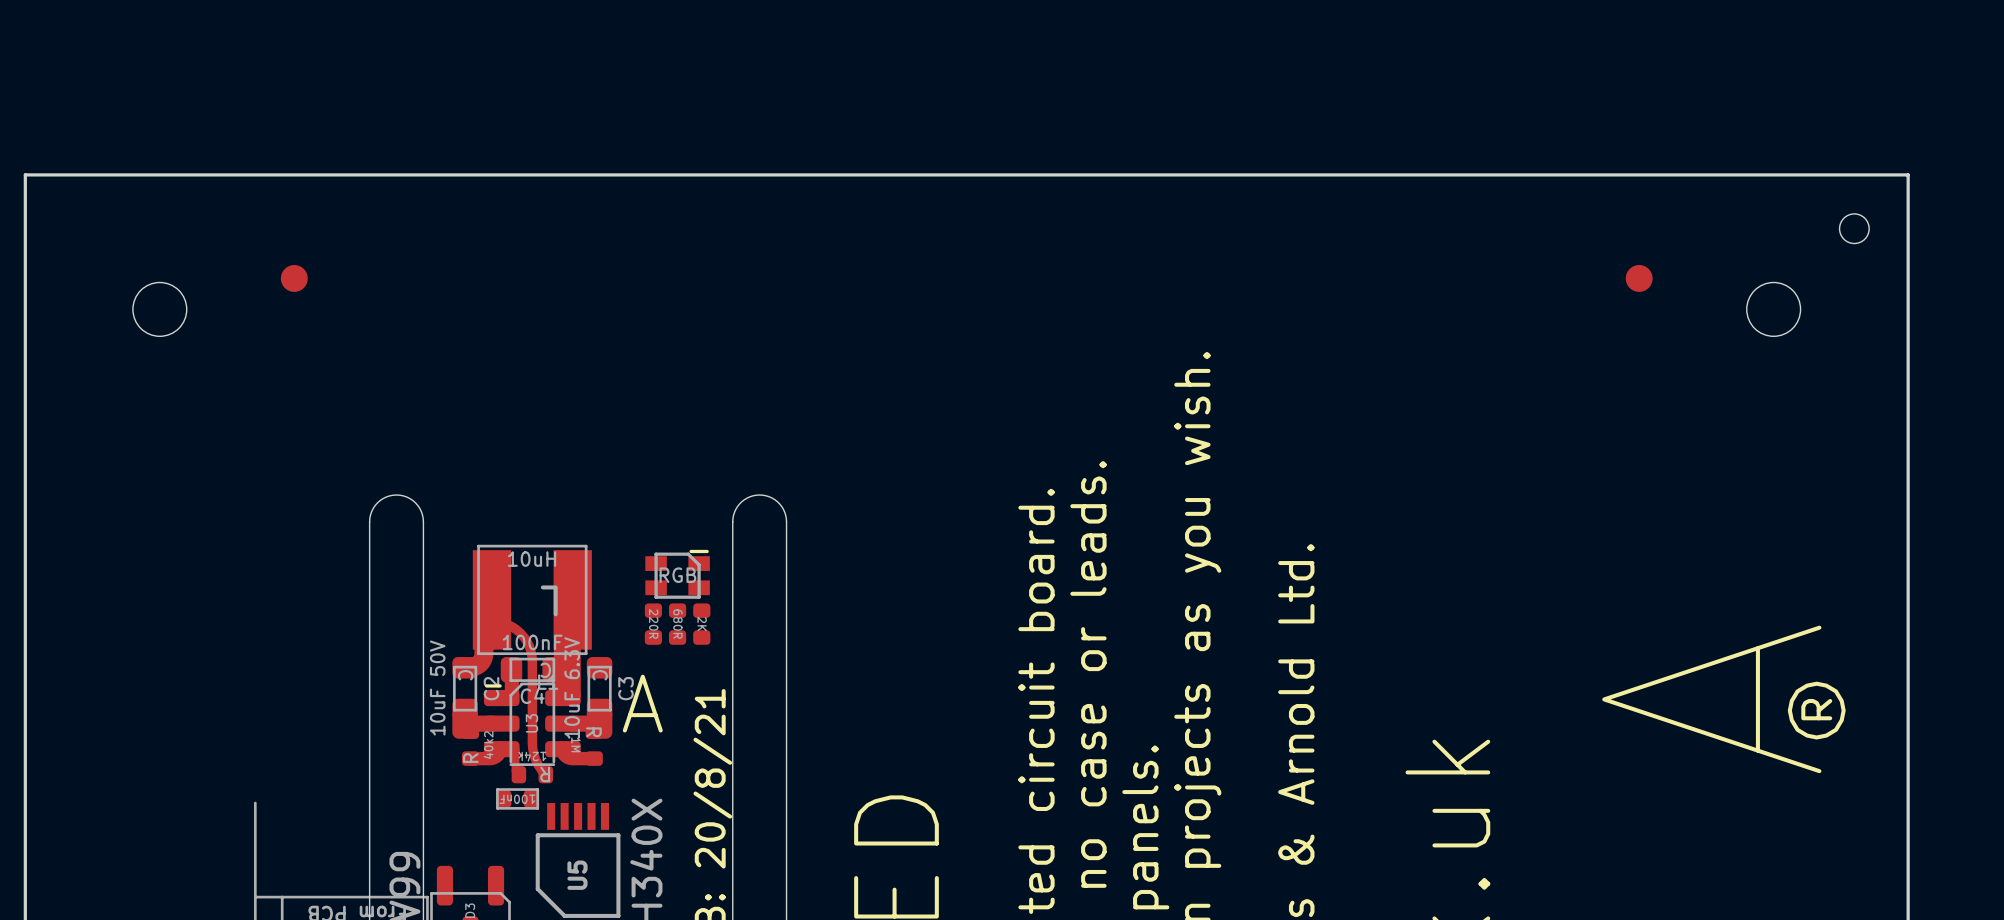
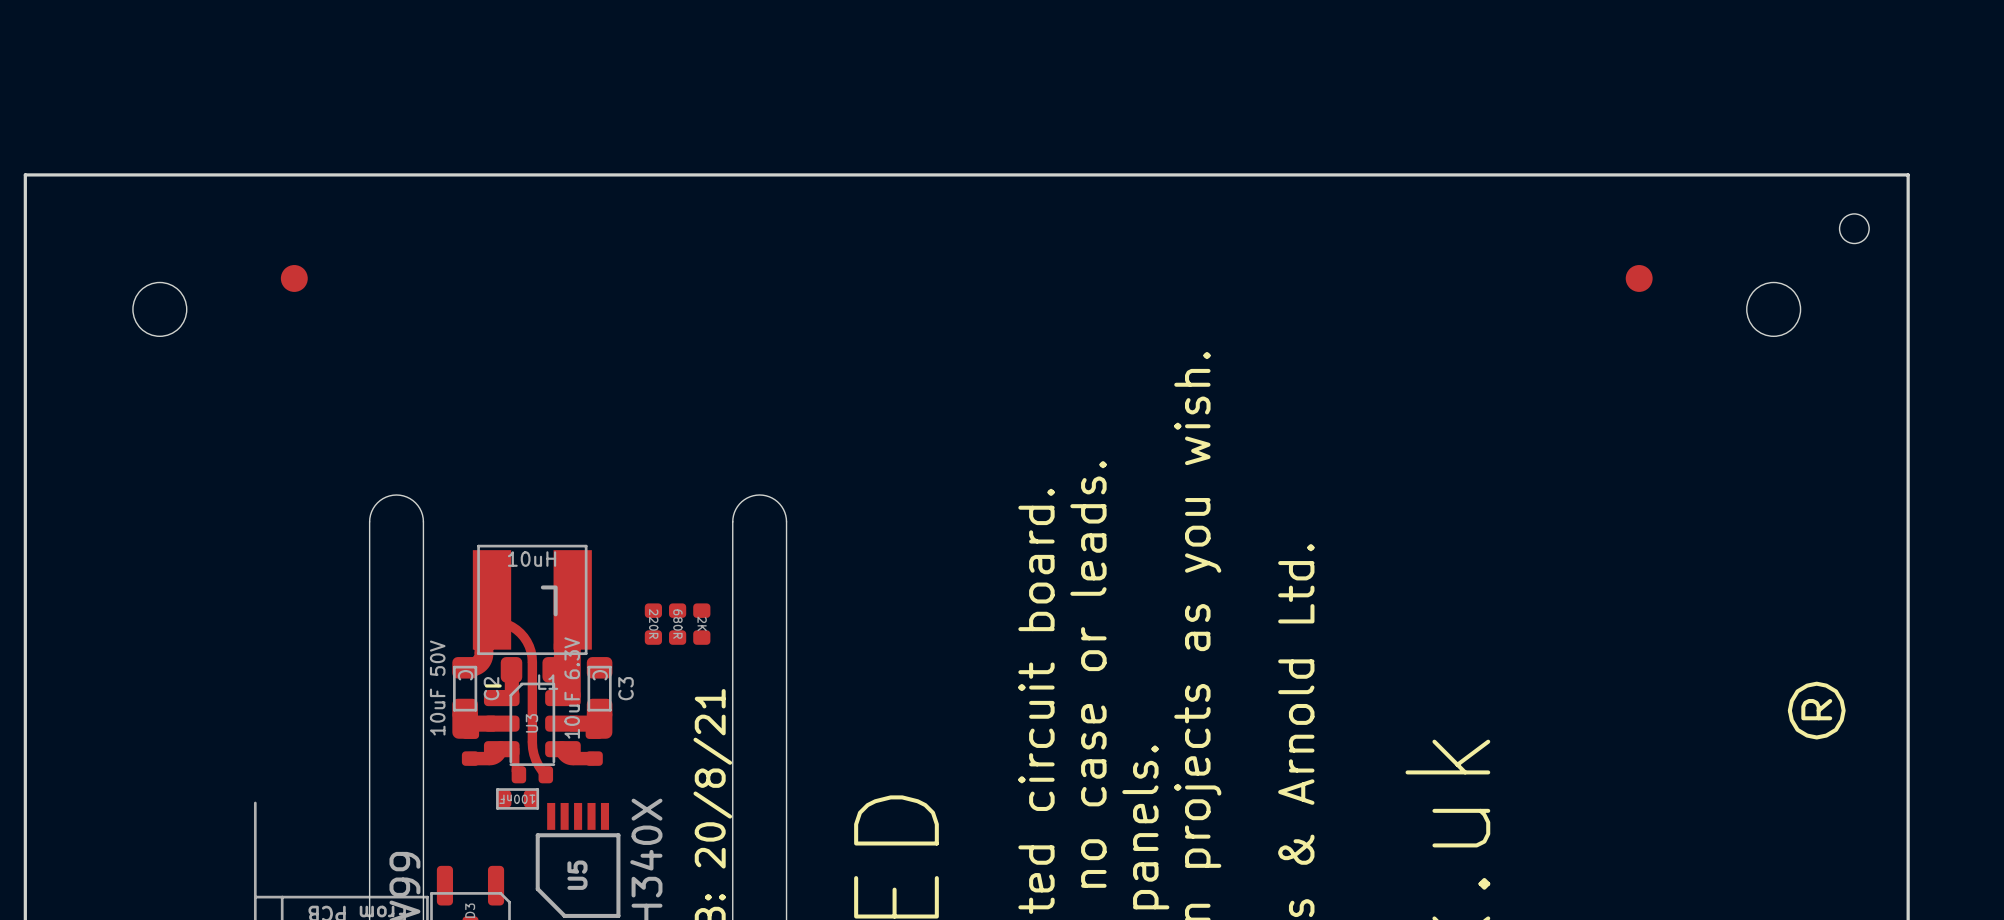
part: RGB (677, 574) -> none
C4: 100nF (532, 669) -> none
text: A (1711, 699) -> none
text: A (642, 703) -> none
drawing: [462, 727, 602, 783] -> none

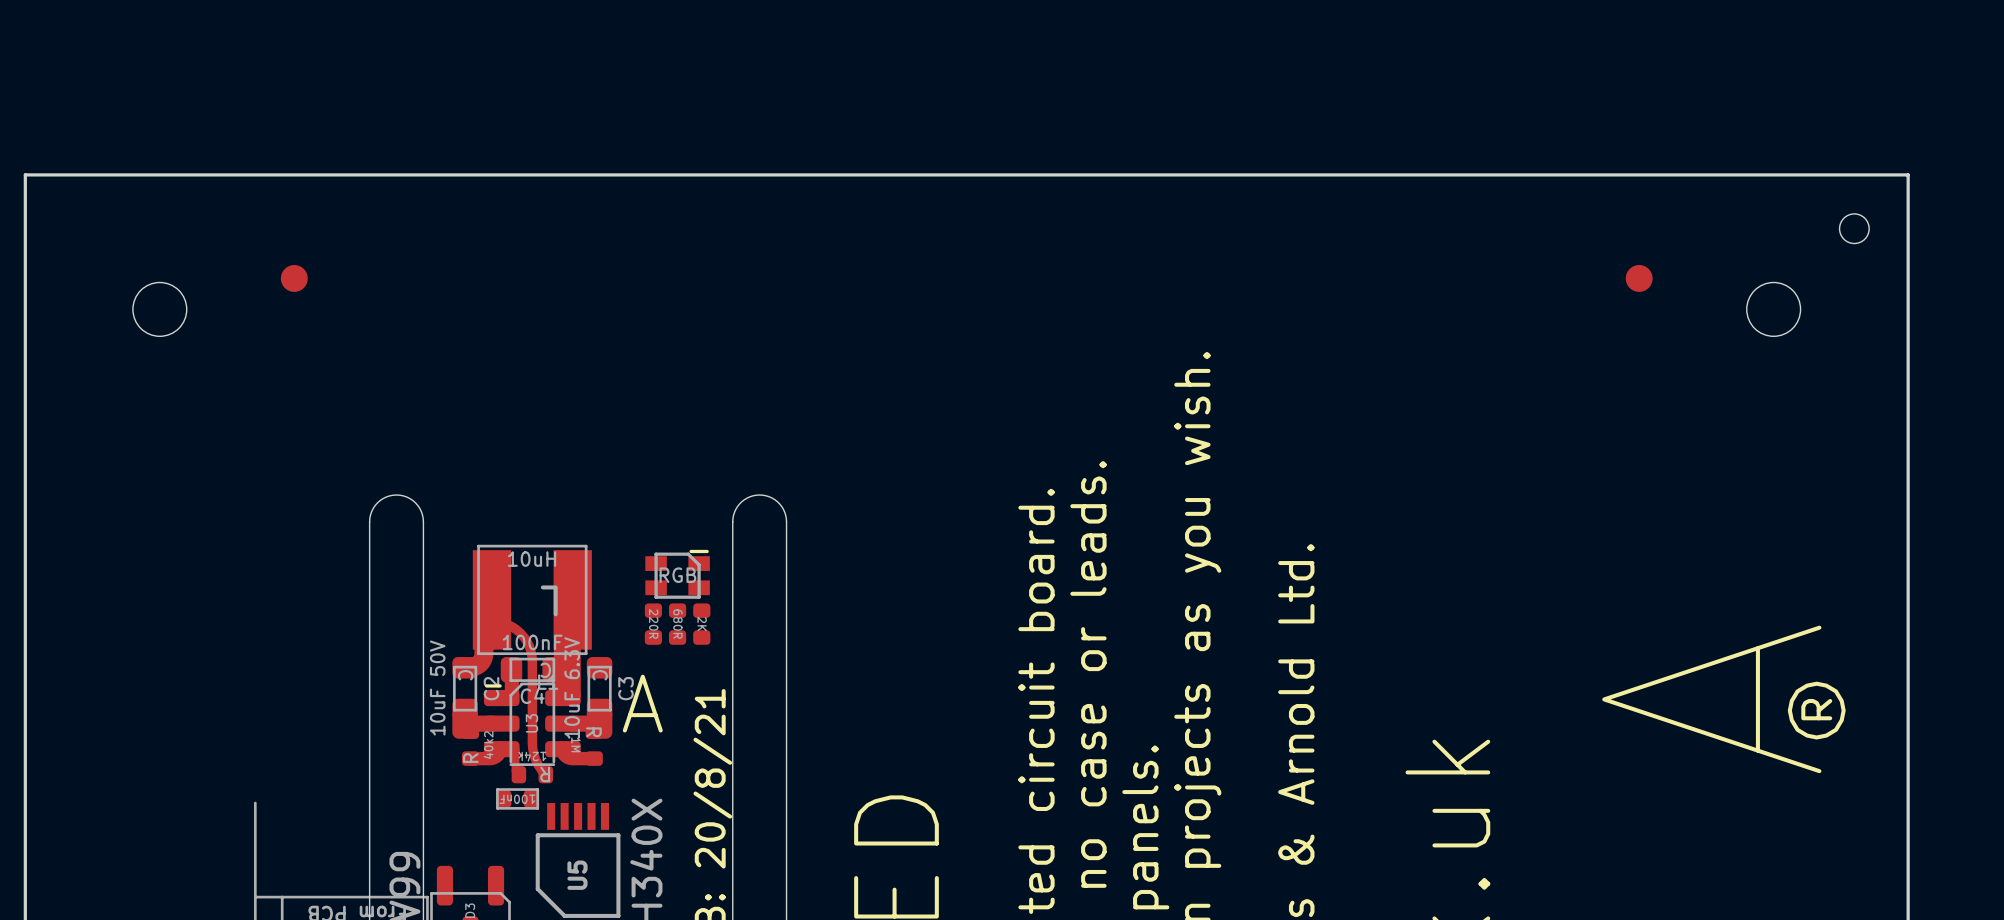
part: none -> RGB (677, 574)
C4: none -> 100nF (532, 669)
text: none -> A (1711, 699)
text: none -> A (642, 703)
drawing: none -> [462, 727, 602, 783]

